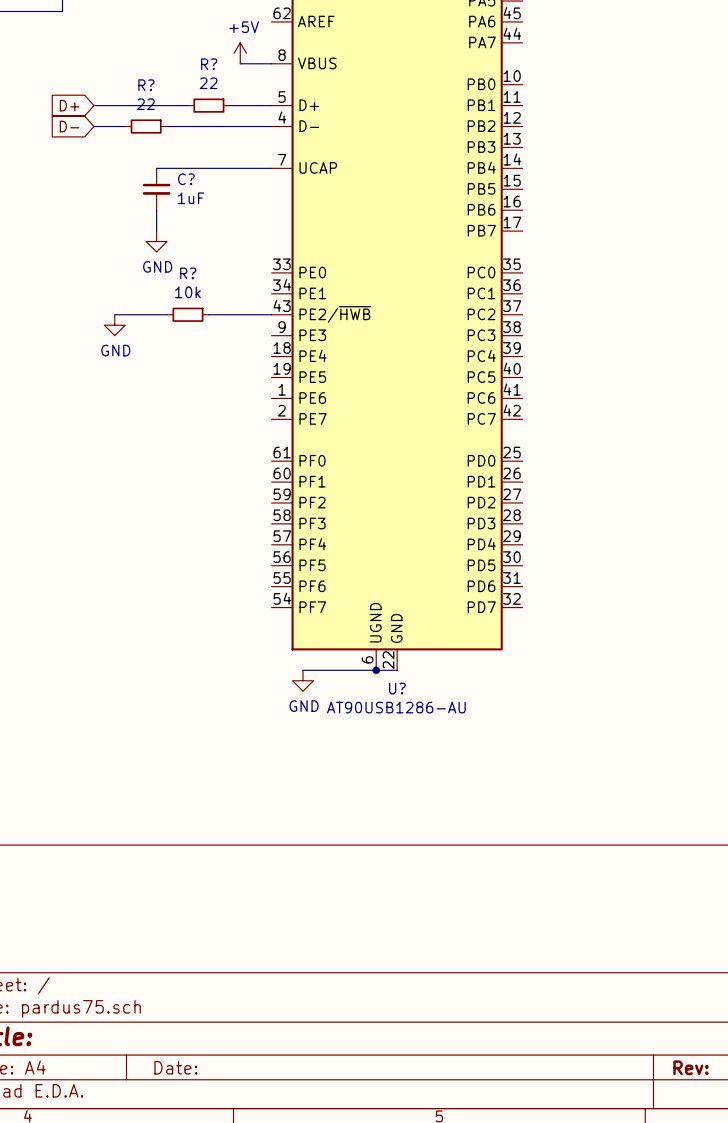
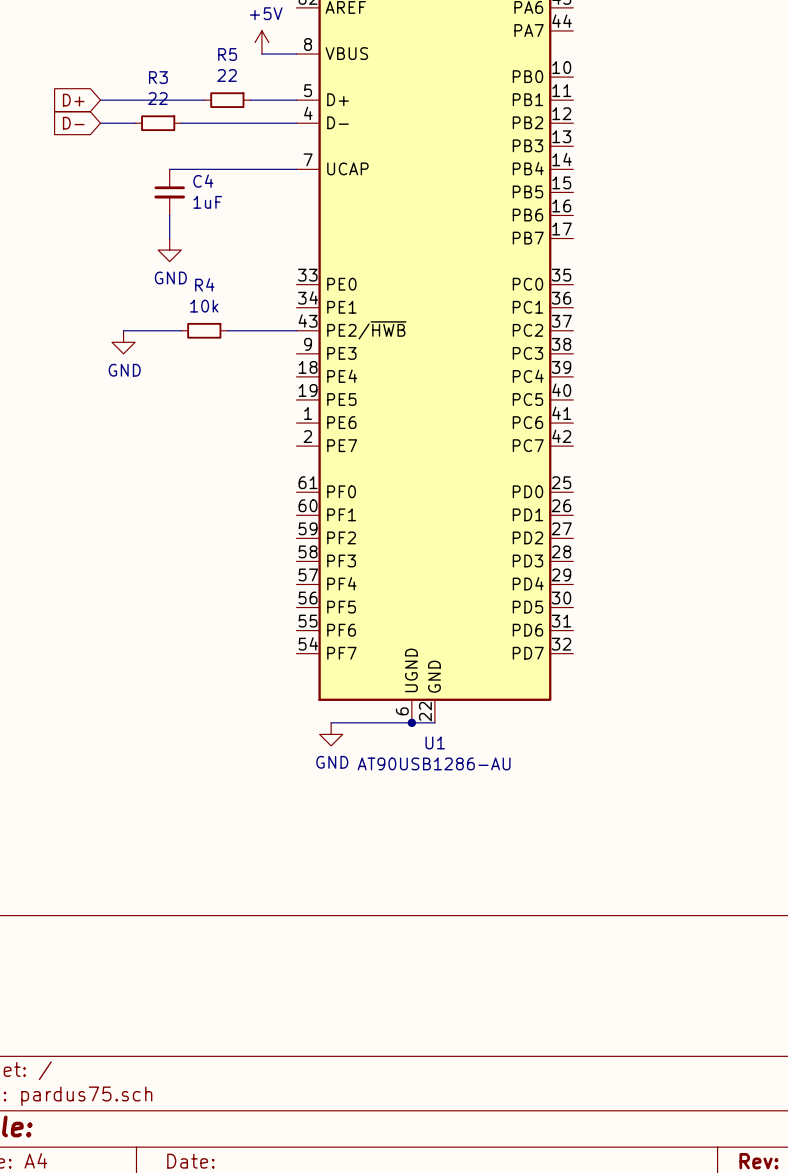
R? name: R? (209, 64) -> R5 (227, 54)
R? name: R? (146, 85) -> R3 (158, 77)
C? name: C? (186, 179) -> C4 (203, 181)
R? name: R? (188, 273) -> R4 (204, 284)
U? name: U? (397, 688) -> U1 (435, 742)

